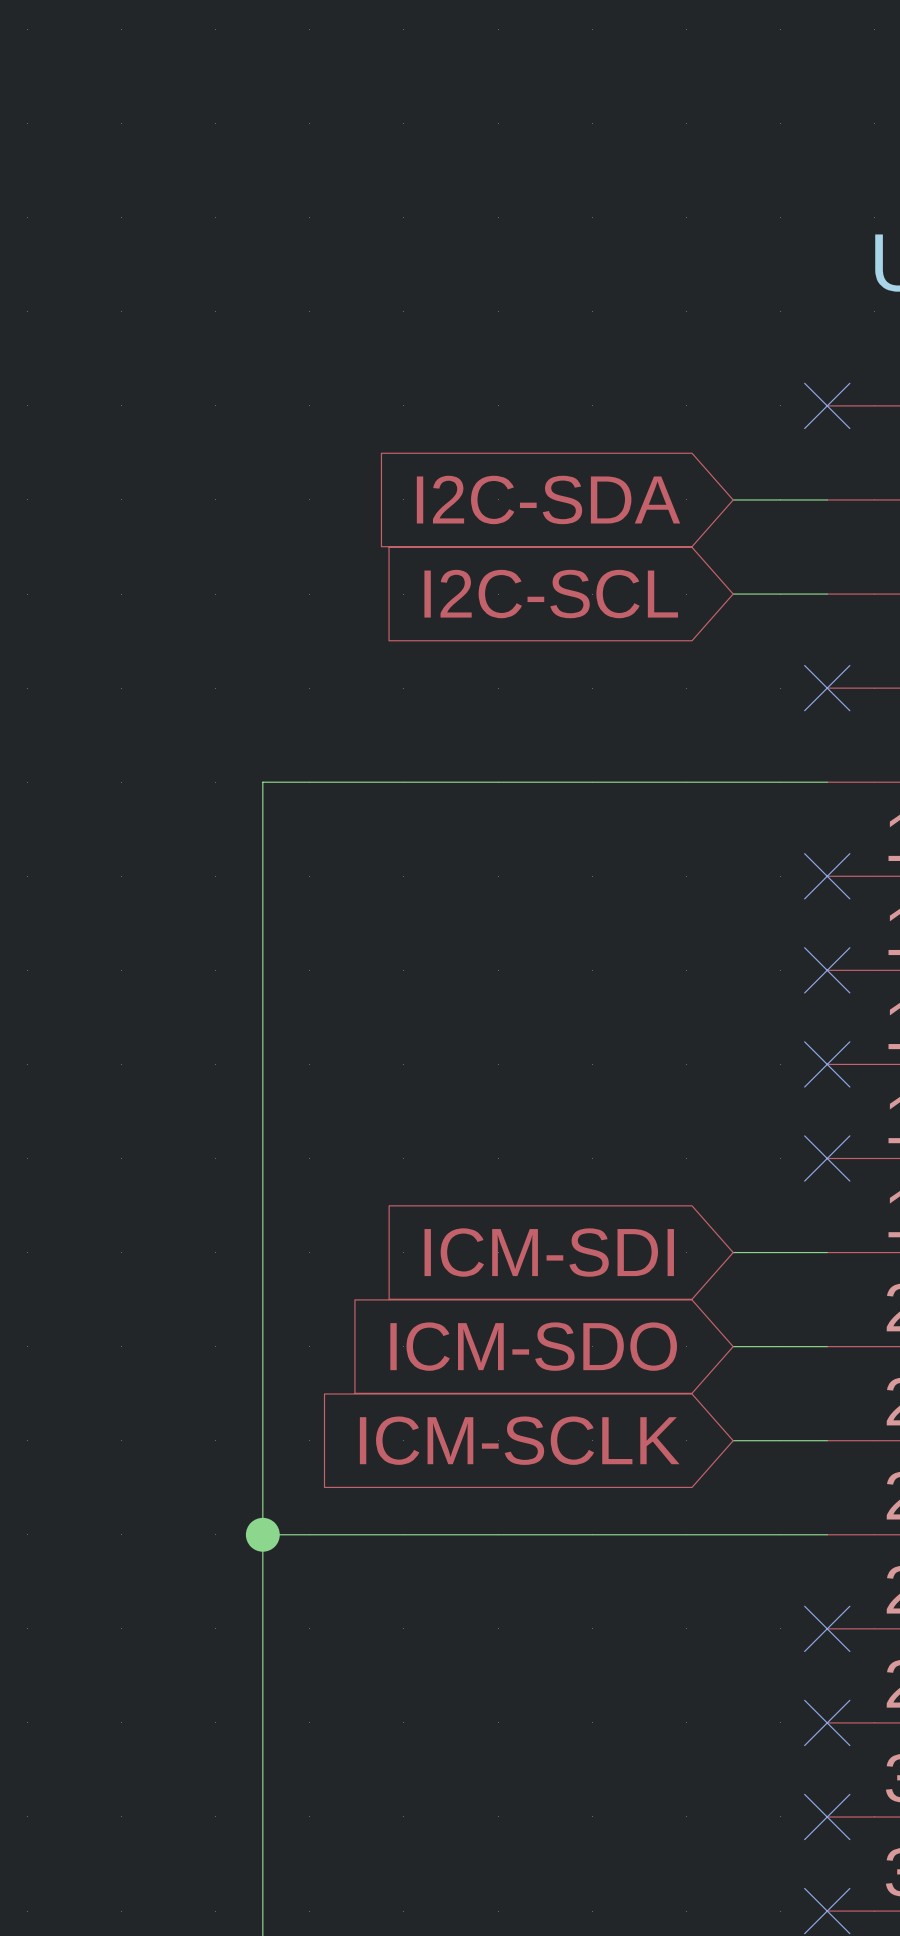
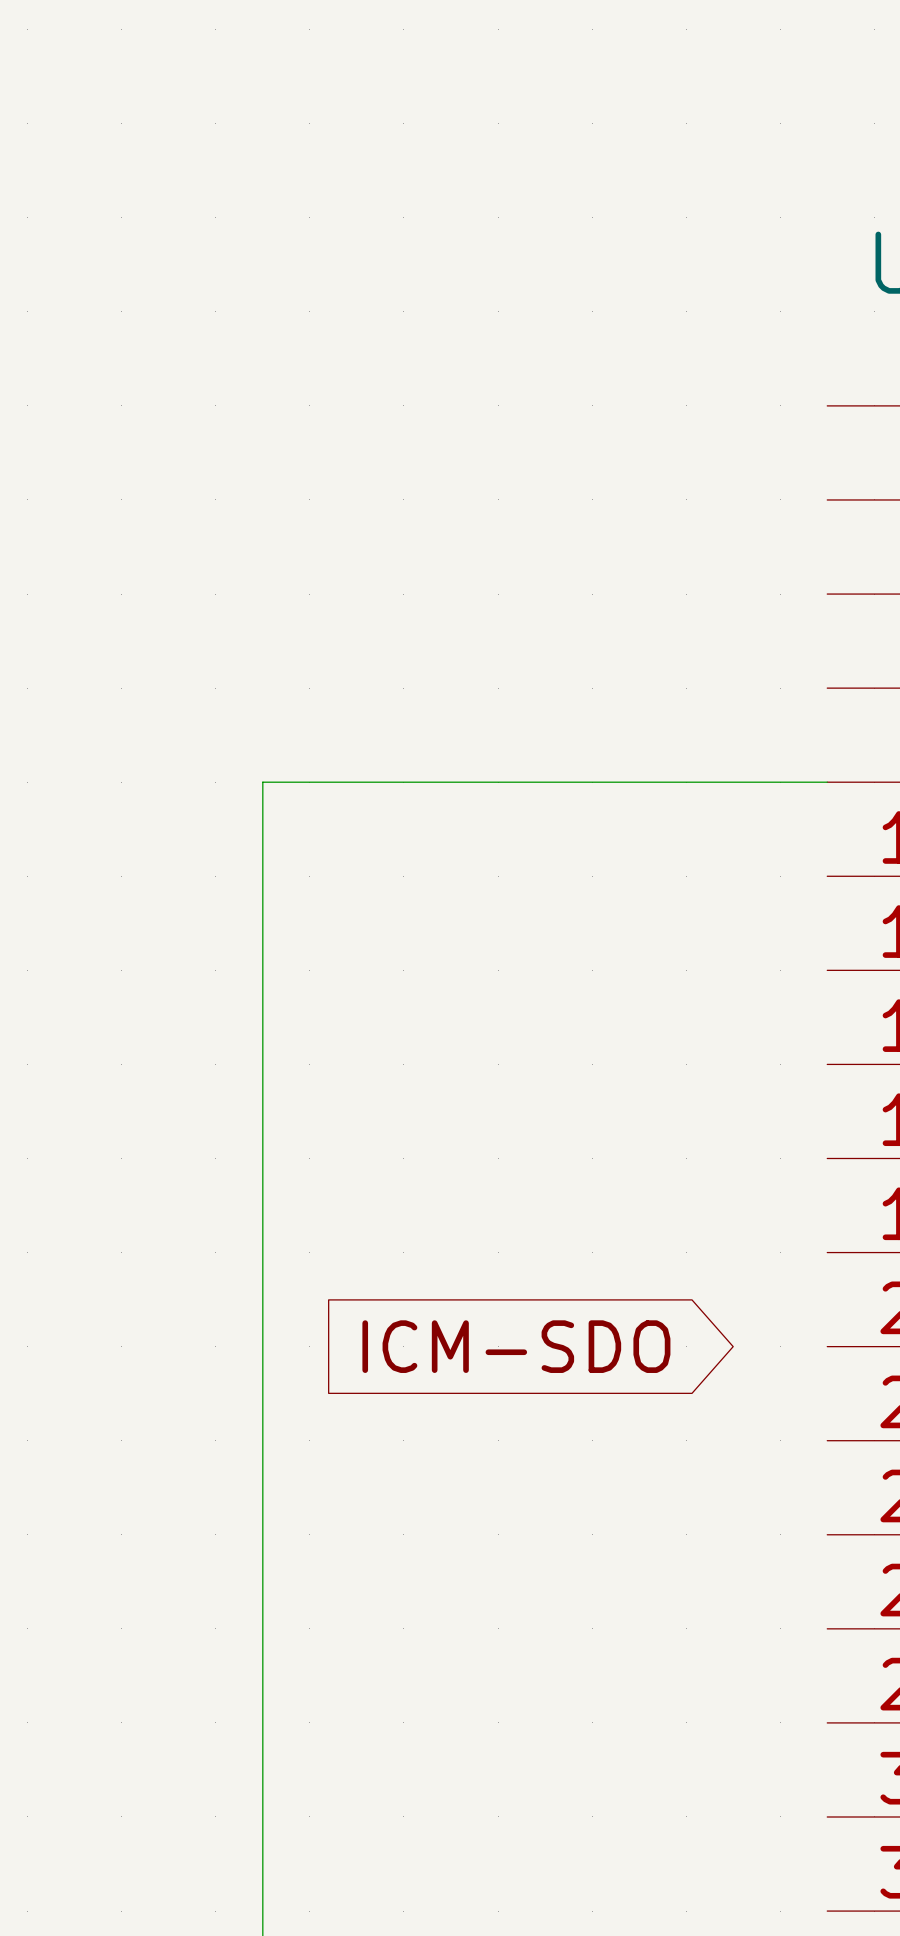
no-connect mark: (827, 405) -> none
global label: I2C-SDA (548, 499) -> none
wire: (733, 499) (827, 499) -> none
global label: I2C-SCL (551, 594) -> none
wire: (733, 594) (827, 594) -> none
no-connect mark: (827, 688) -> none
no-connect mark: (827, 876) -> none
no-connect mark: (827, 970) -> none
no-connect mark: (827, 1064) -> none
no-connect mark: (827, 1158) -> none
global label: ICM-SDI (549, 1252) -> none
wire: (733, 1252) (827, 1252) -> none
wire: (733, 1346) (827, 1346) -> none
global label: ICM-SCLK (519, 1440) -> none
wire: (733, 1440) (827, 1440) -> none
wire: (262, 1534) (827, 1534) -> none
junction: (262, 1534) -> none
no-connect mark: (827, 1628) -> none
no-connect mark: (827, 1722) -> none
no-connect mark: (827, 1816) -> none
no-connect mark: (827, 1911) -> none

